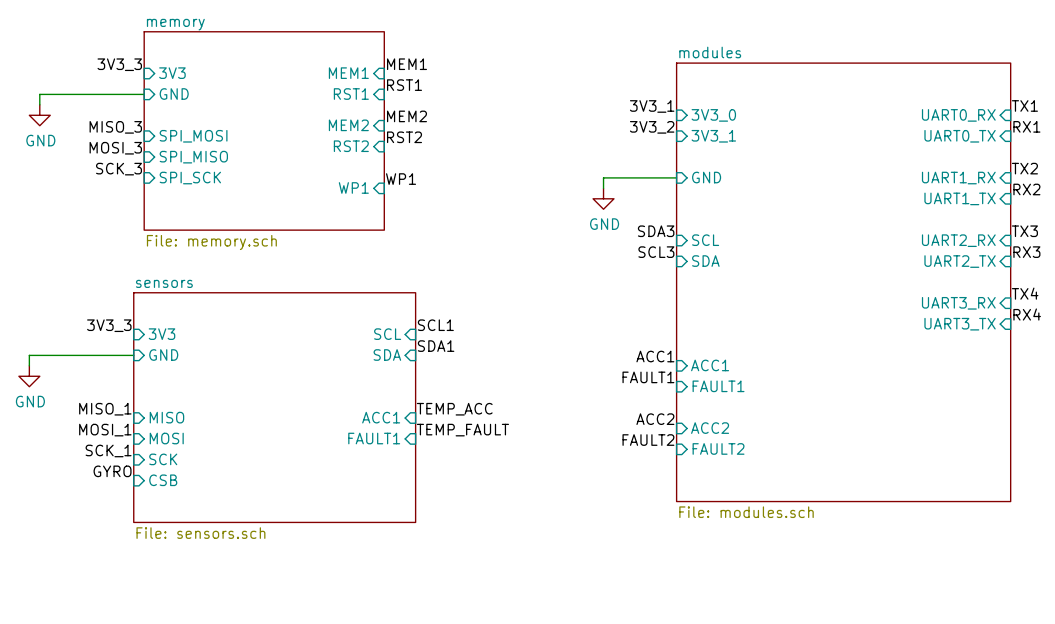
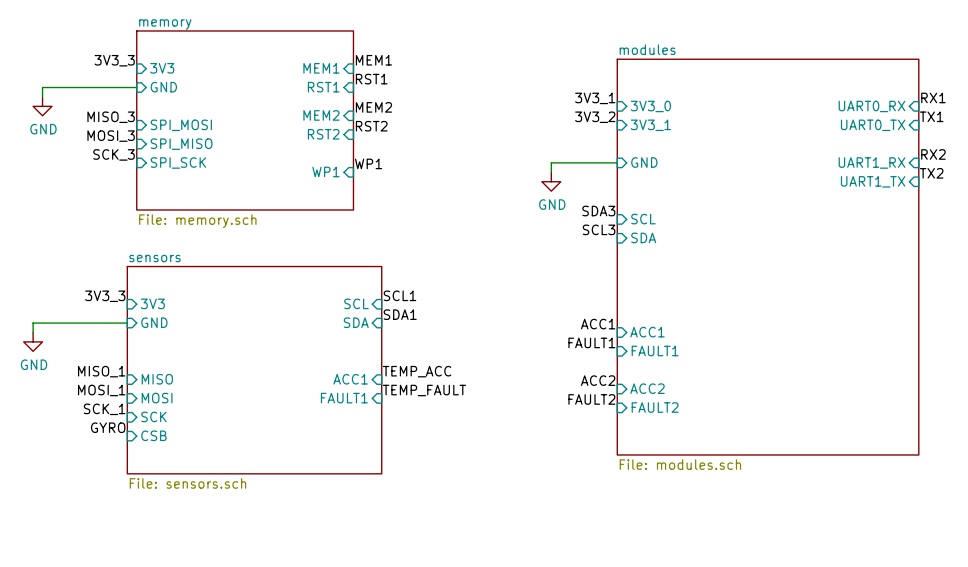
label: TX1 (1024, 105) -> RX1 (933, 97)
label: RX1 (1026, 126) -> TX1 (931, 116)
label: TX2 (1024, 168) -> RX2 (933, 154)
label: RX2 (1026, 189) -> TX2 (931, 173)
label: TX3 (1024, 231) -> none
sheet pin: UART2_RX (958, 240) -> none
label: RX3 (1026, 252) -> none
sheet pin: UART2_TX (960, 261) -> none
label: TX4 (1025, 293) -> none
sheet pin: UART3_RX (958, 303) -> none
label: RX4 (1027, 314) -> none
sheet pin: UART3_TX (960, 324) -> none

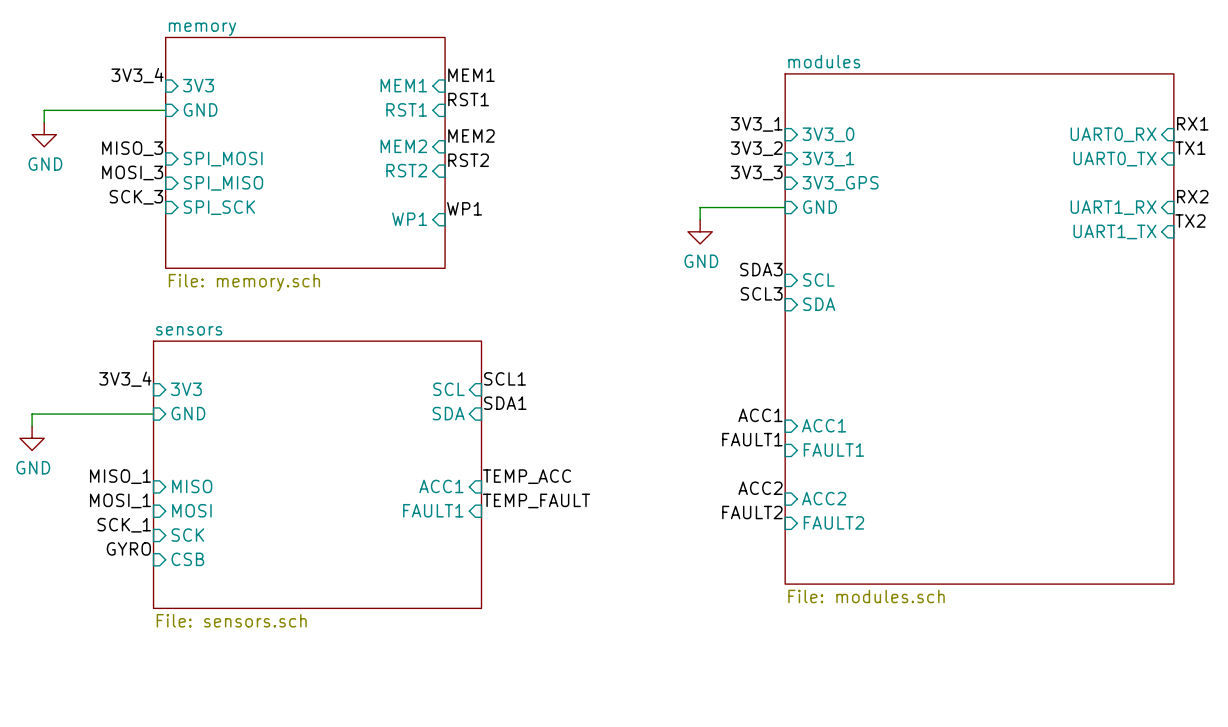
label: 3V3_3 (114, 60) -> 3V3_4 (137, 75)
label: none -> 3V3_3 (756, 172)
sheet pin: none -> 3V3_GPS (840, 183)
label: 3V3_3 (105, 296) -> 3V3_4 (125, 379)

